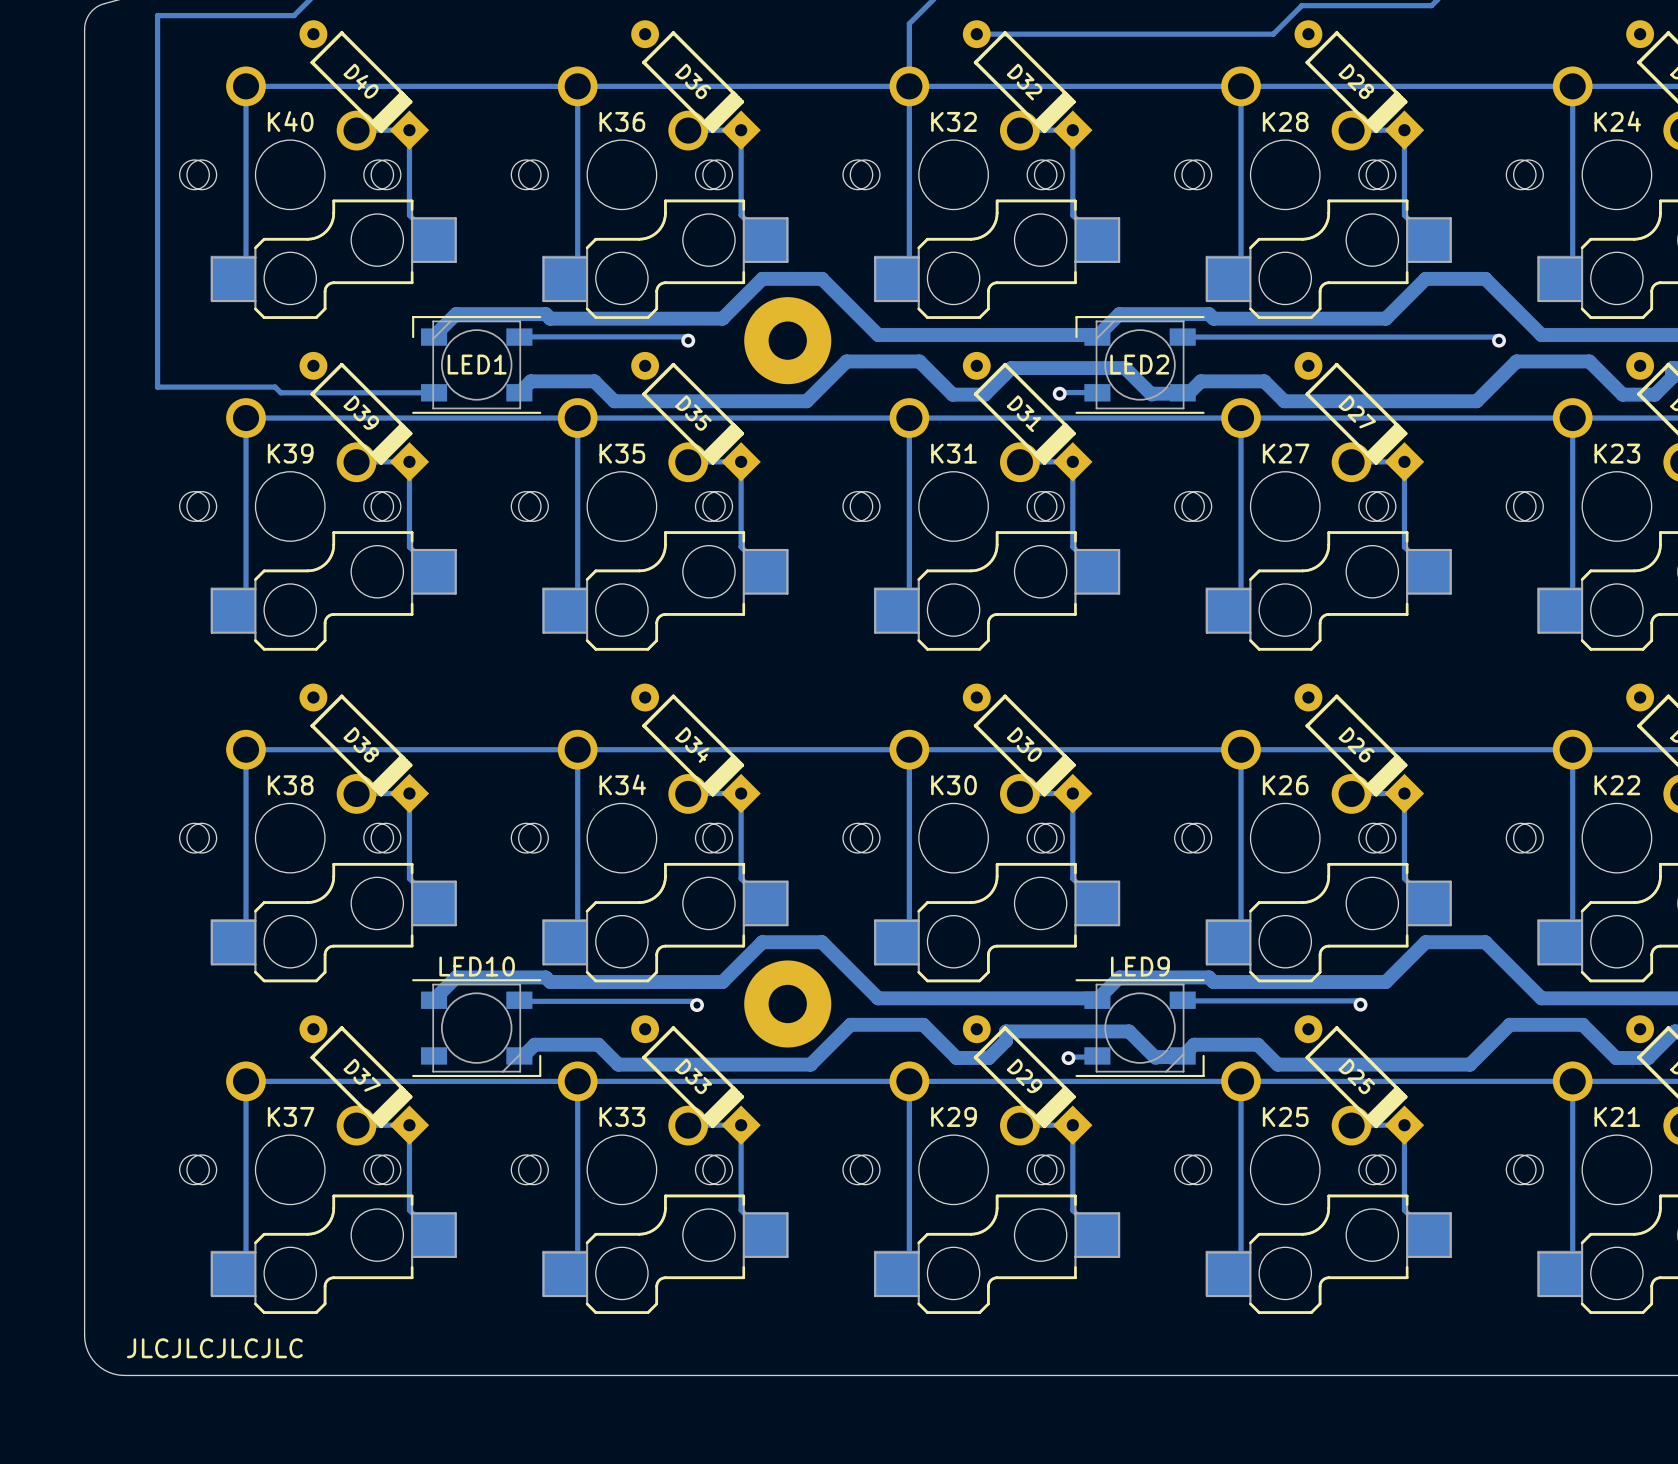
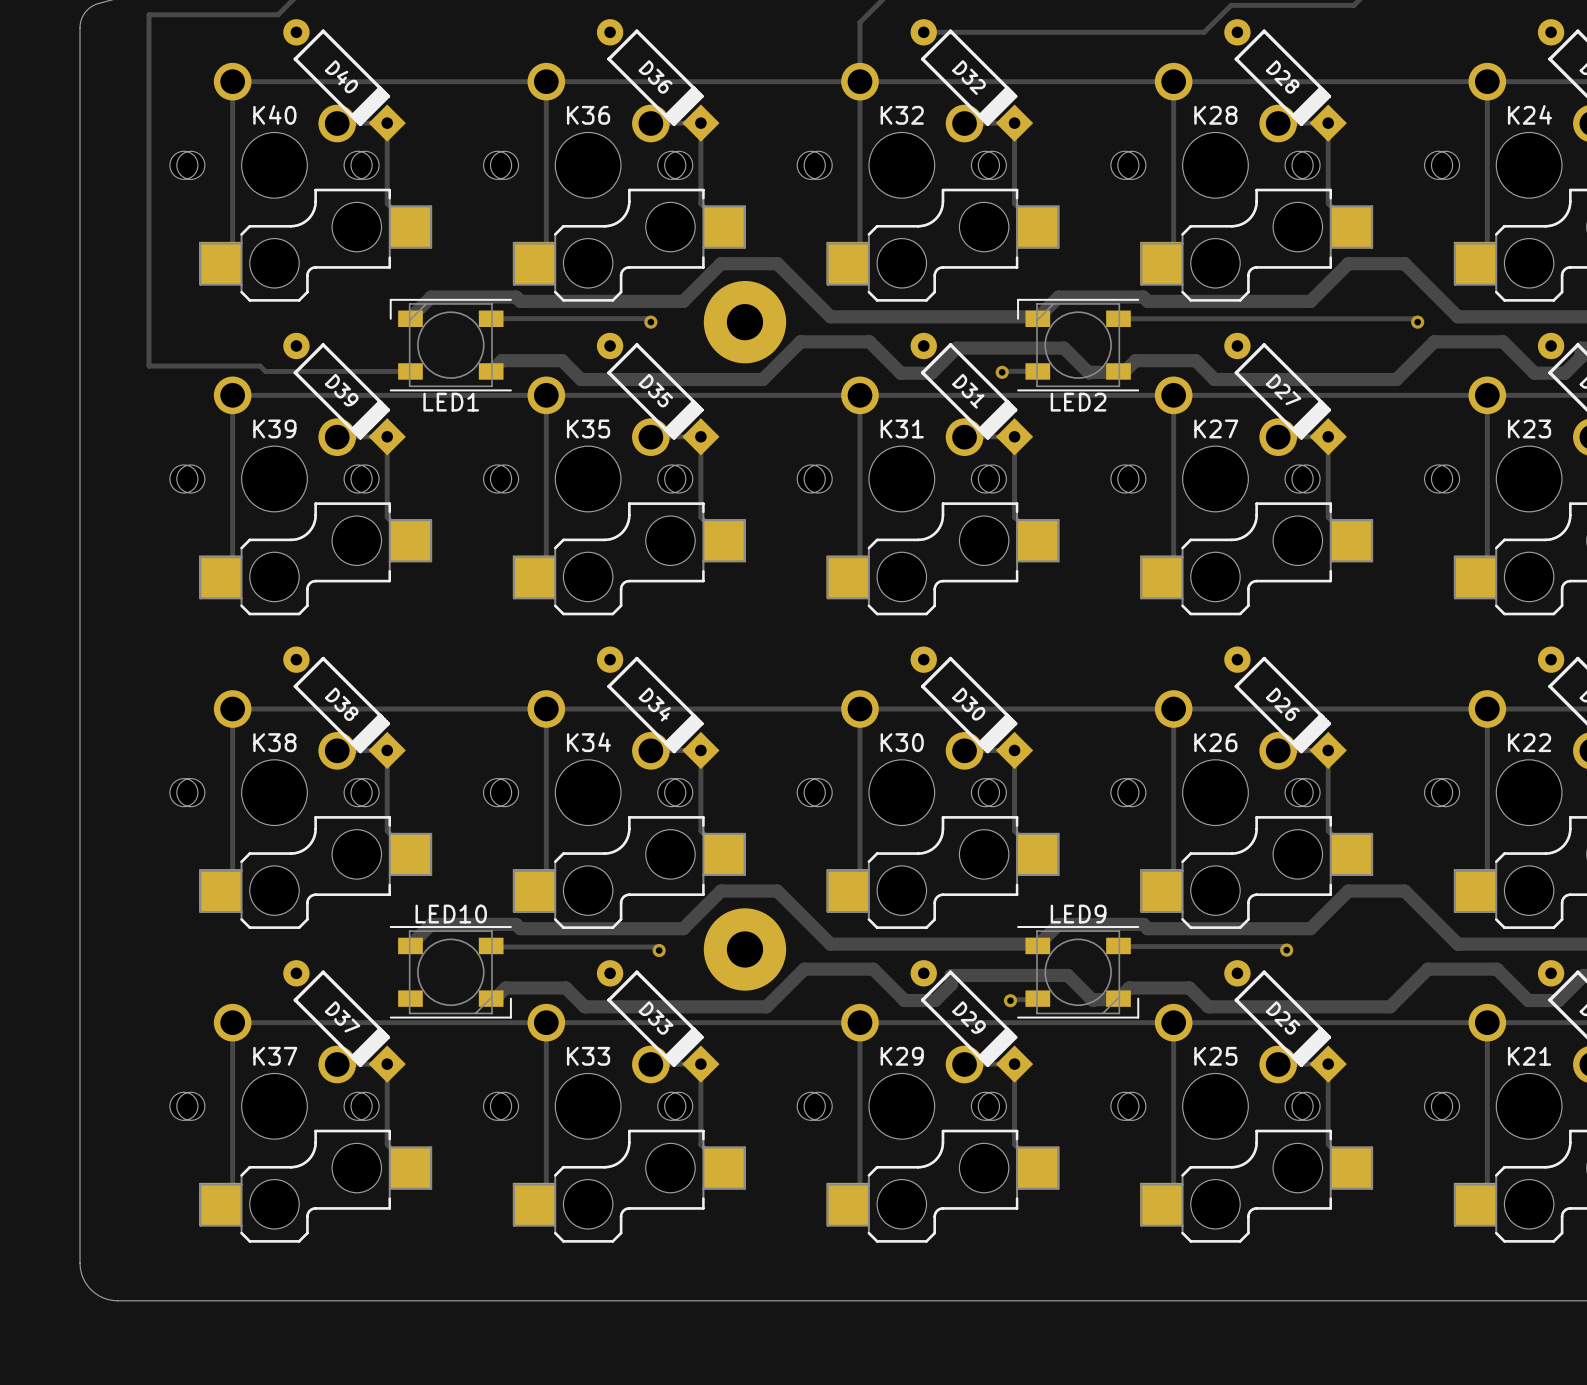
LED1 name position: LED1 (477, 364) -> LED1 (451, 402)
LED2 name position: LED2 (1139, 364) -> LED2 (1078, 402)
text: JLCJLCJLCJLC (214, 1348) -> none

